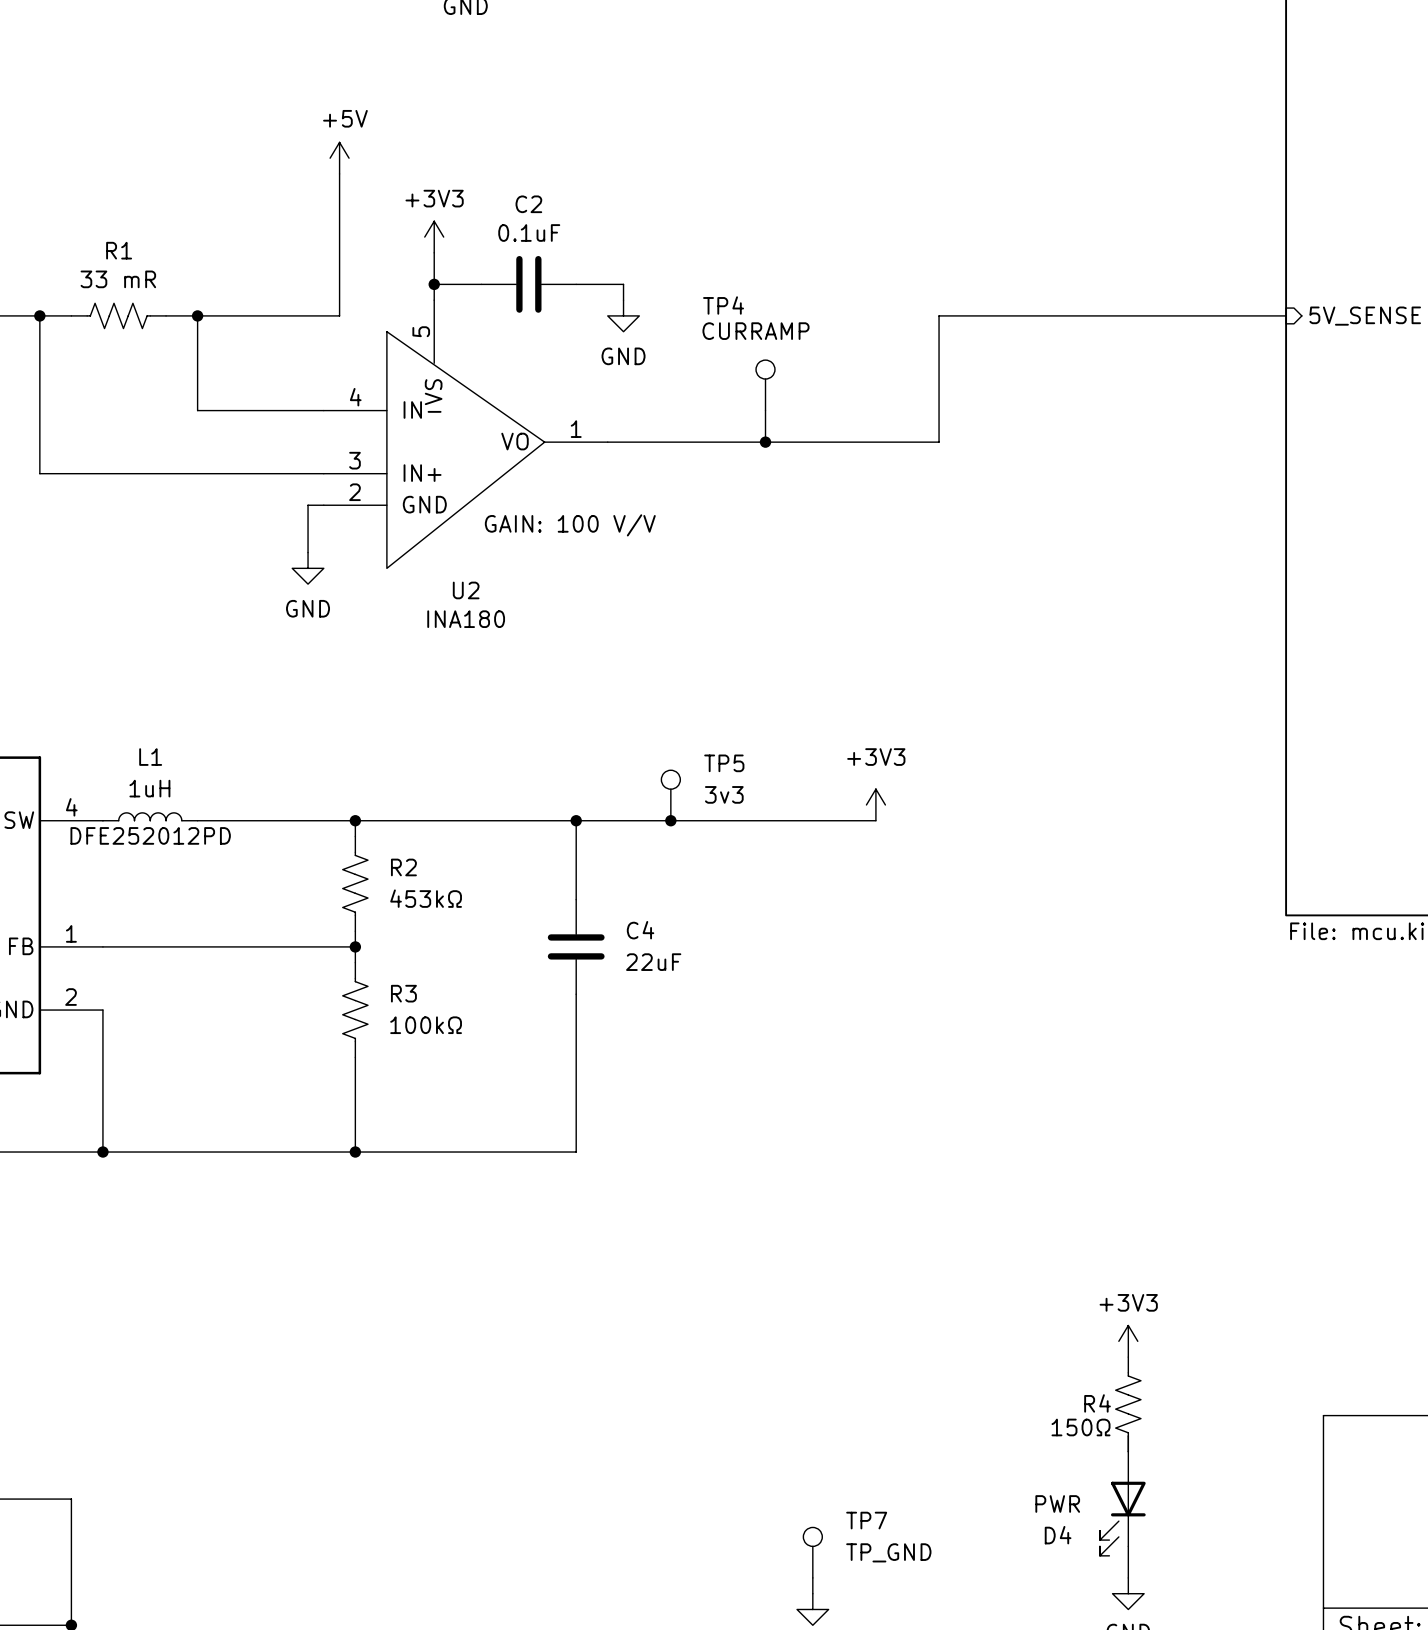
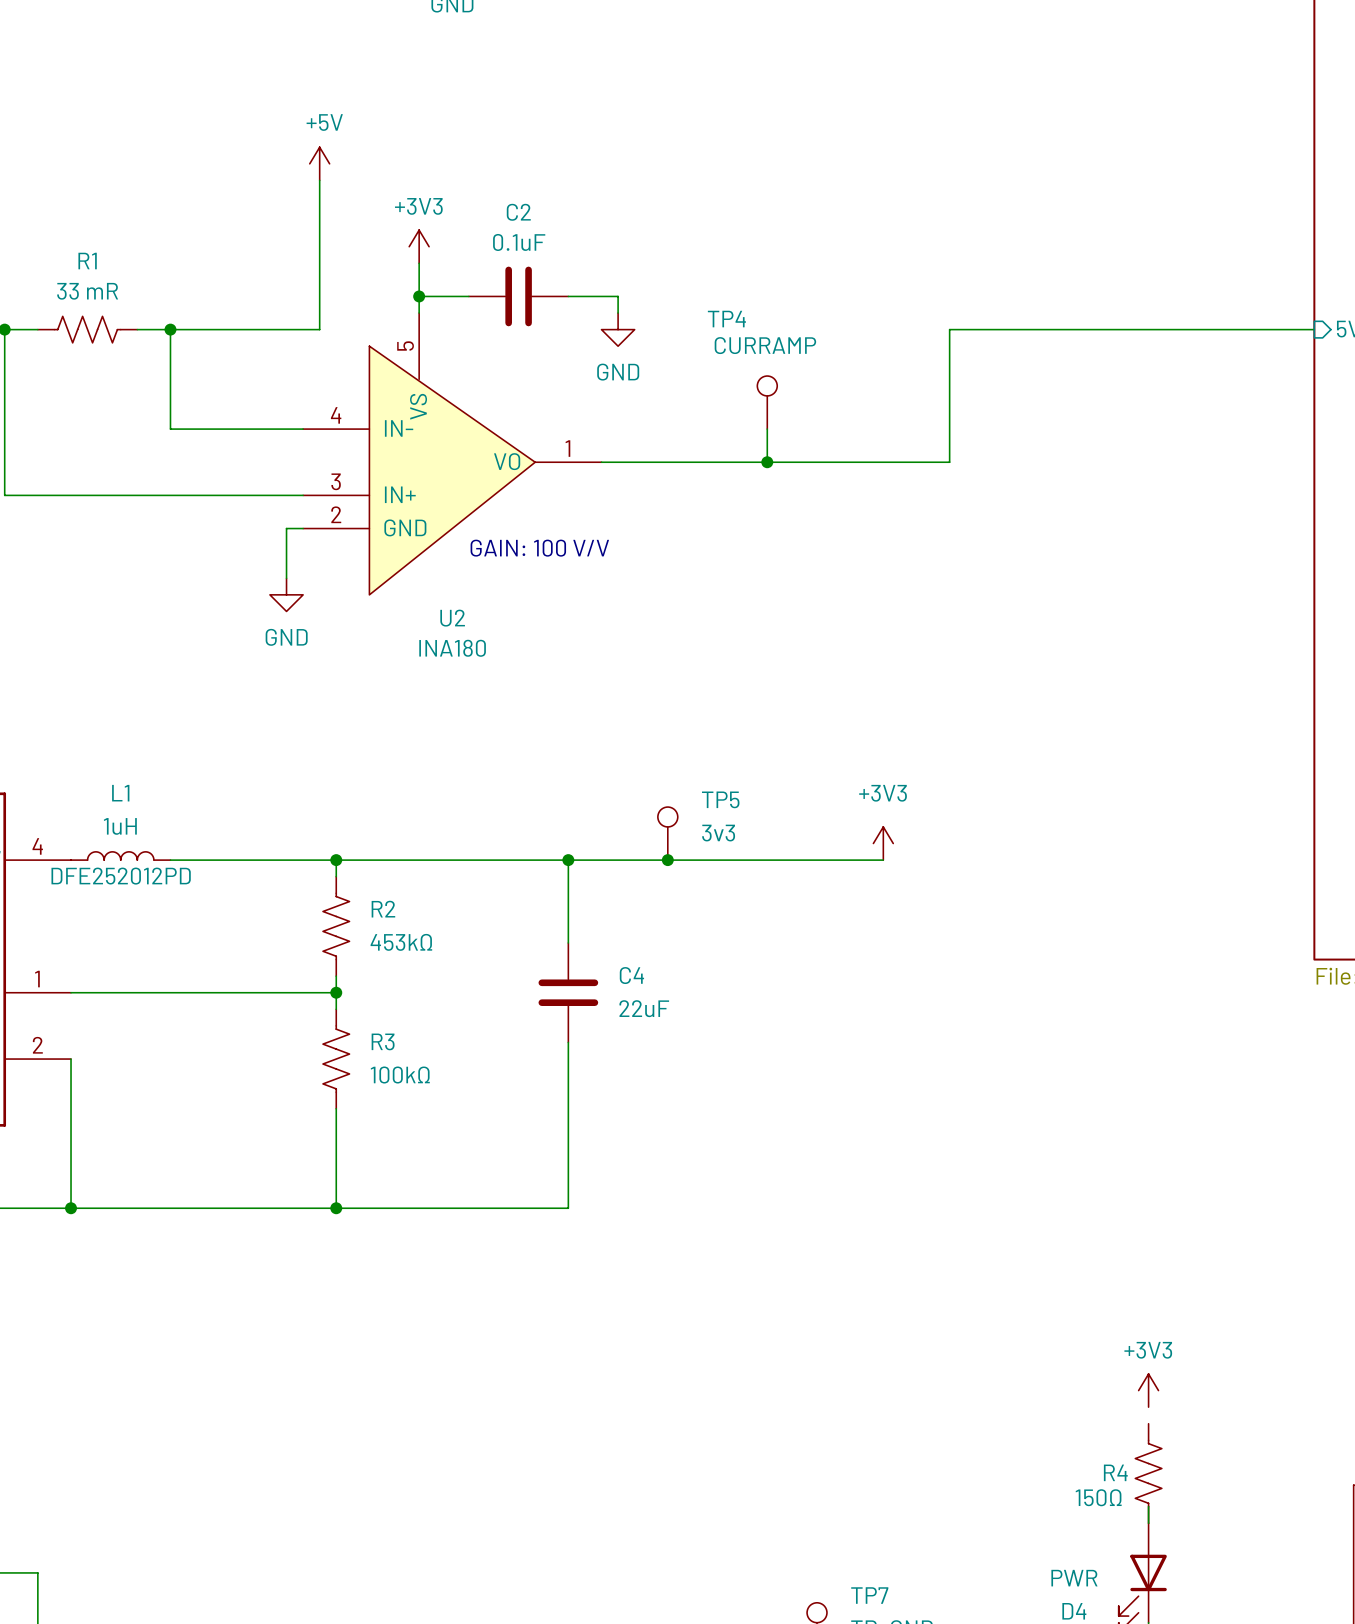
power symbol position: +3V3 (1128, 1341) -> +3V3 (1148, 1390)

